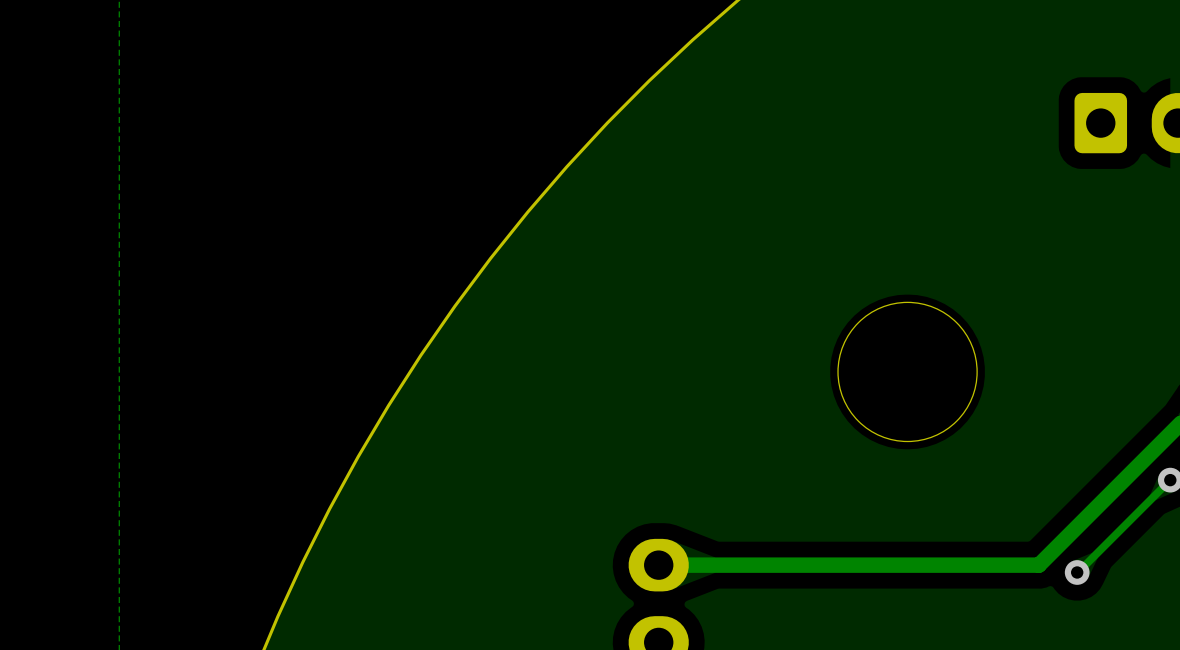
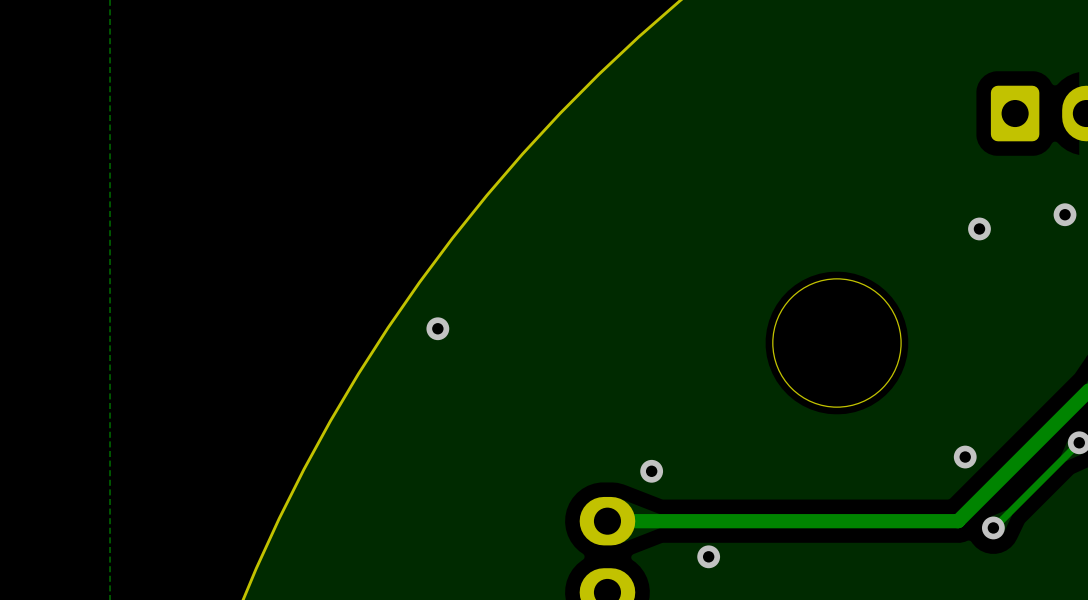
via: none -> (1065, 214)
via: none -> (979, 228)
via: none -> (437, 328)
via: none -> (965, 457)
via: none -> (651, 471)
via: none -> (708, 556)

